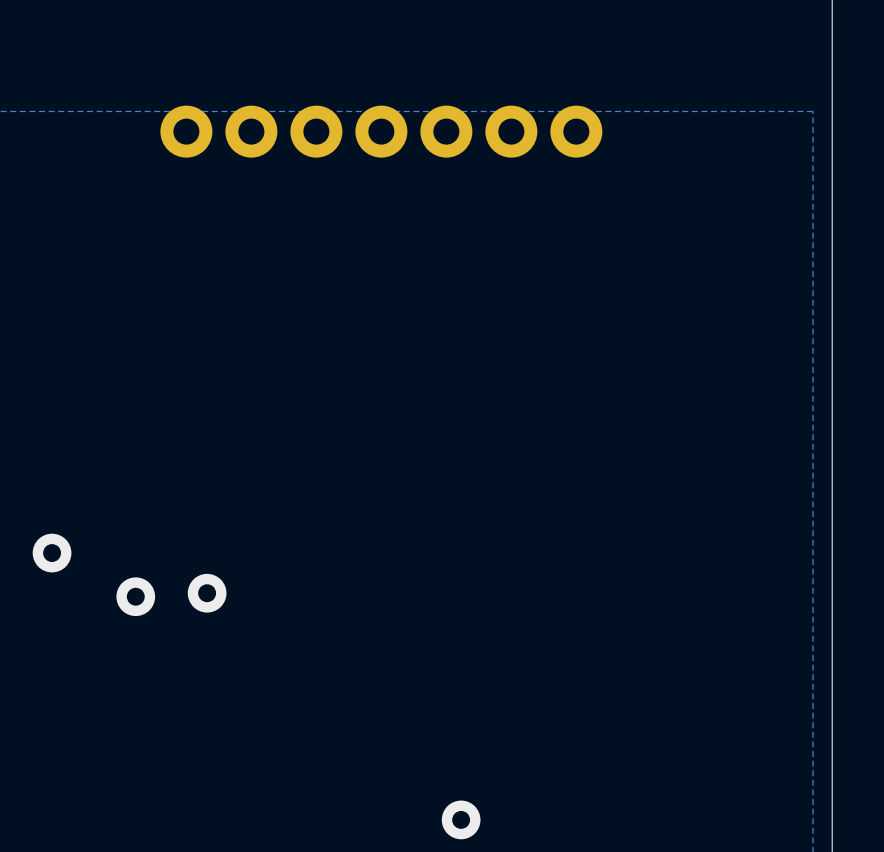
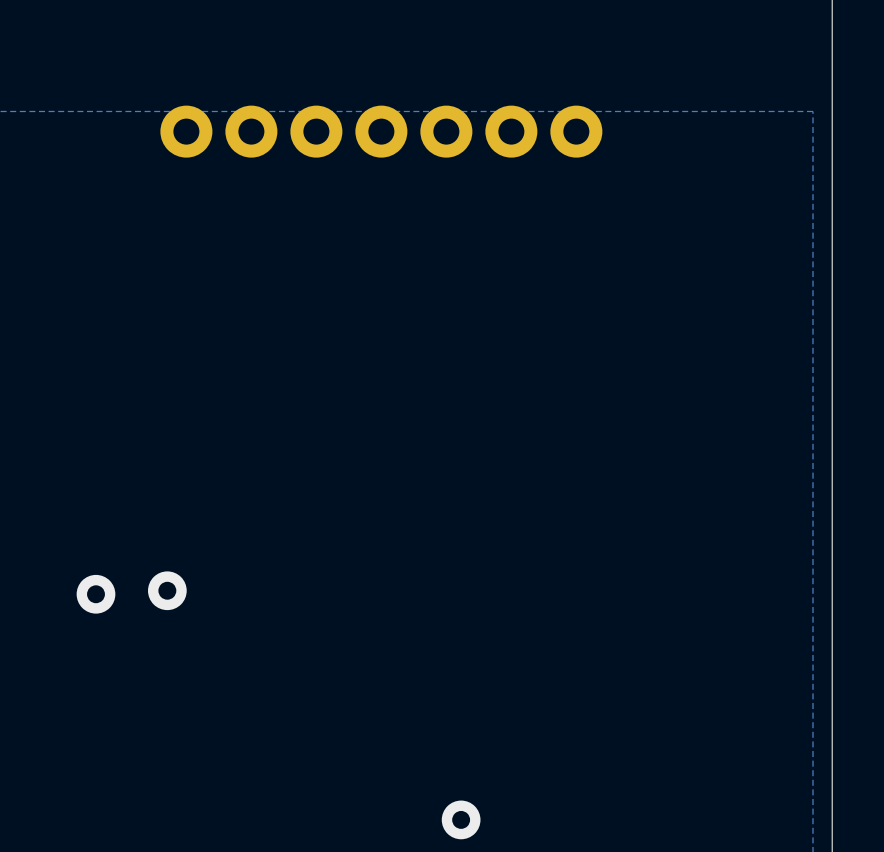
via: (52, 553) -> none
via: (207, 593) -> none
via: none -> (95, 594)
via position: (135, 596) -> (167, 590)

